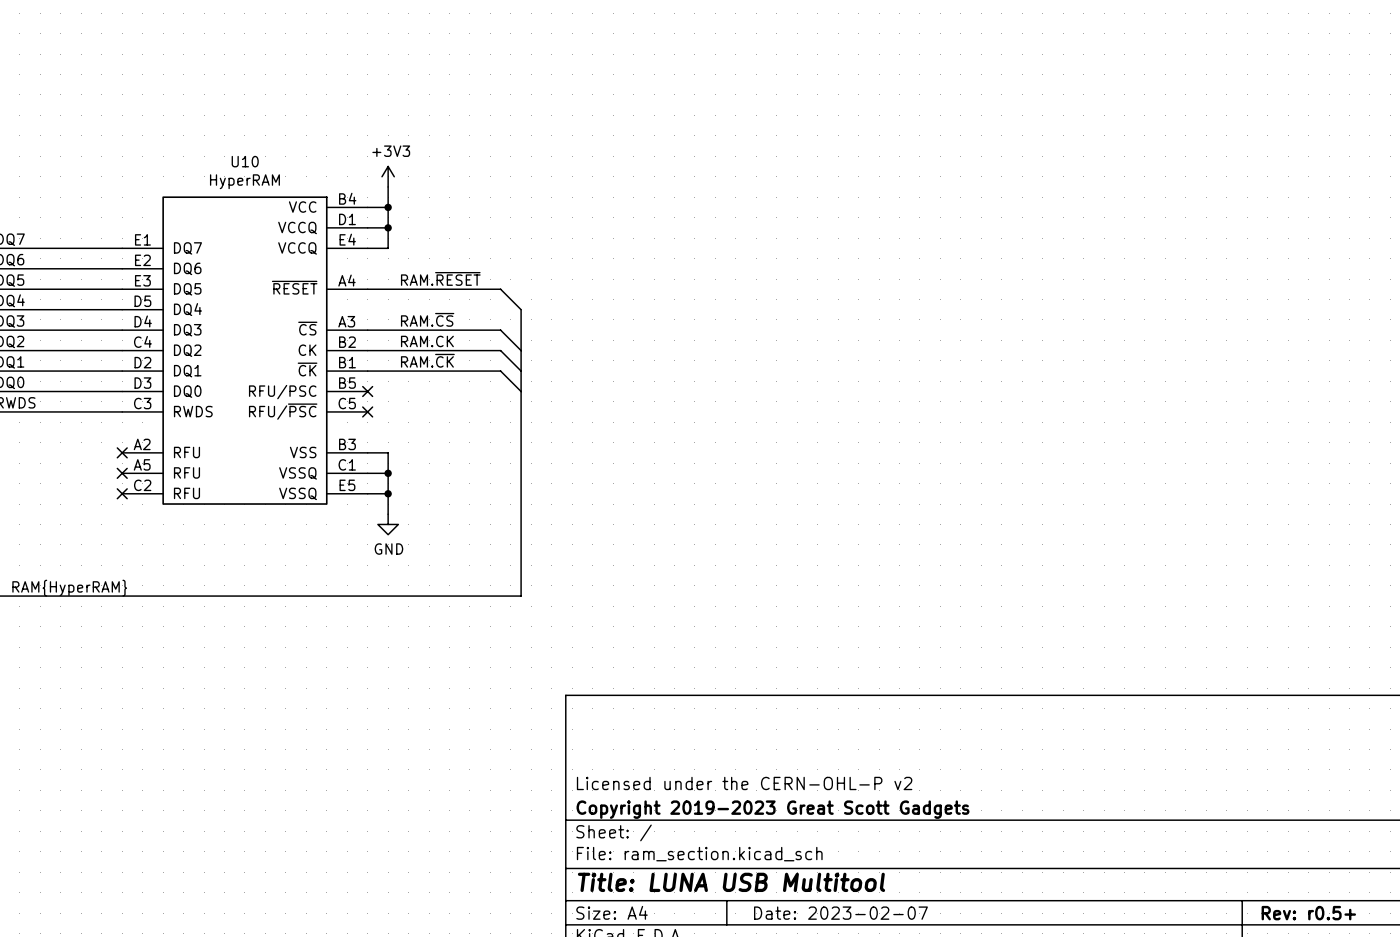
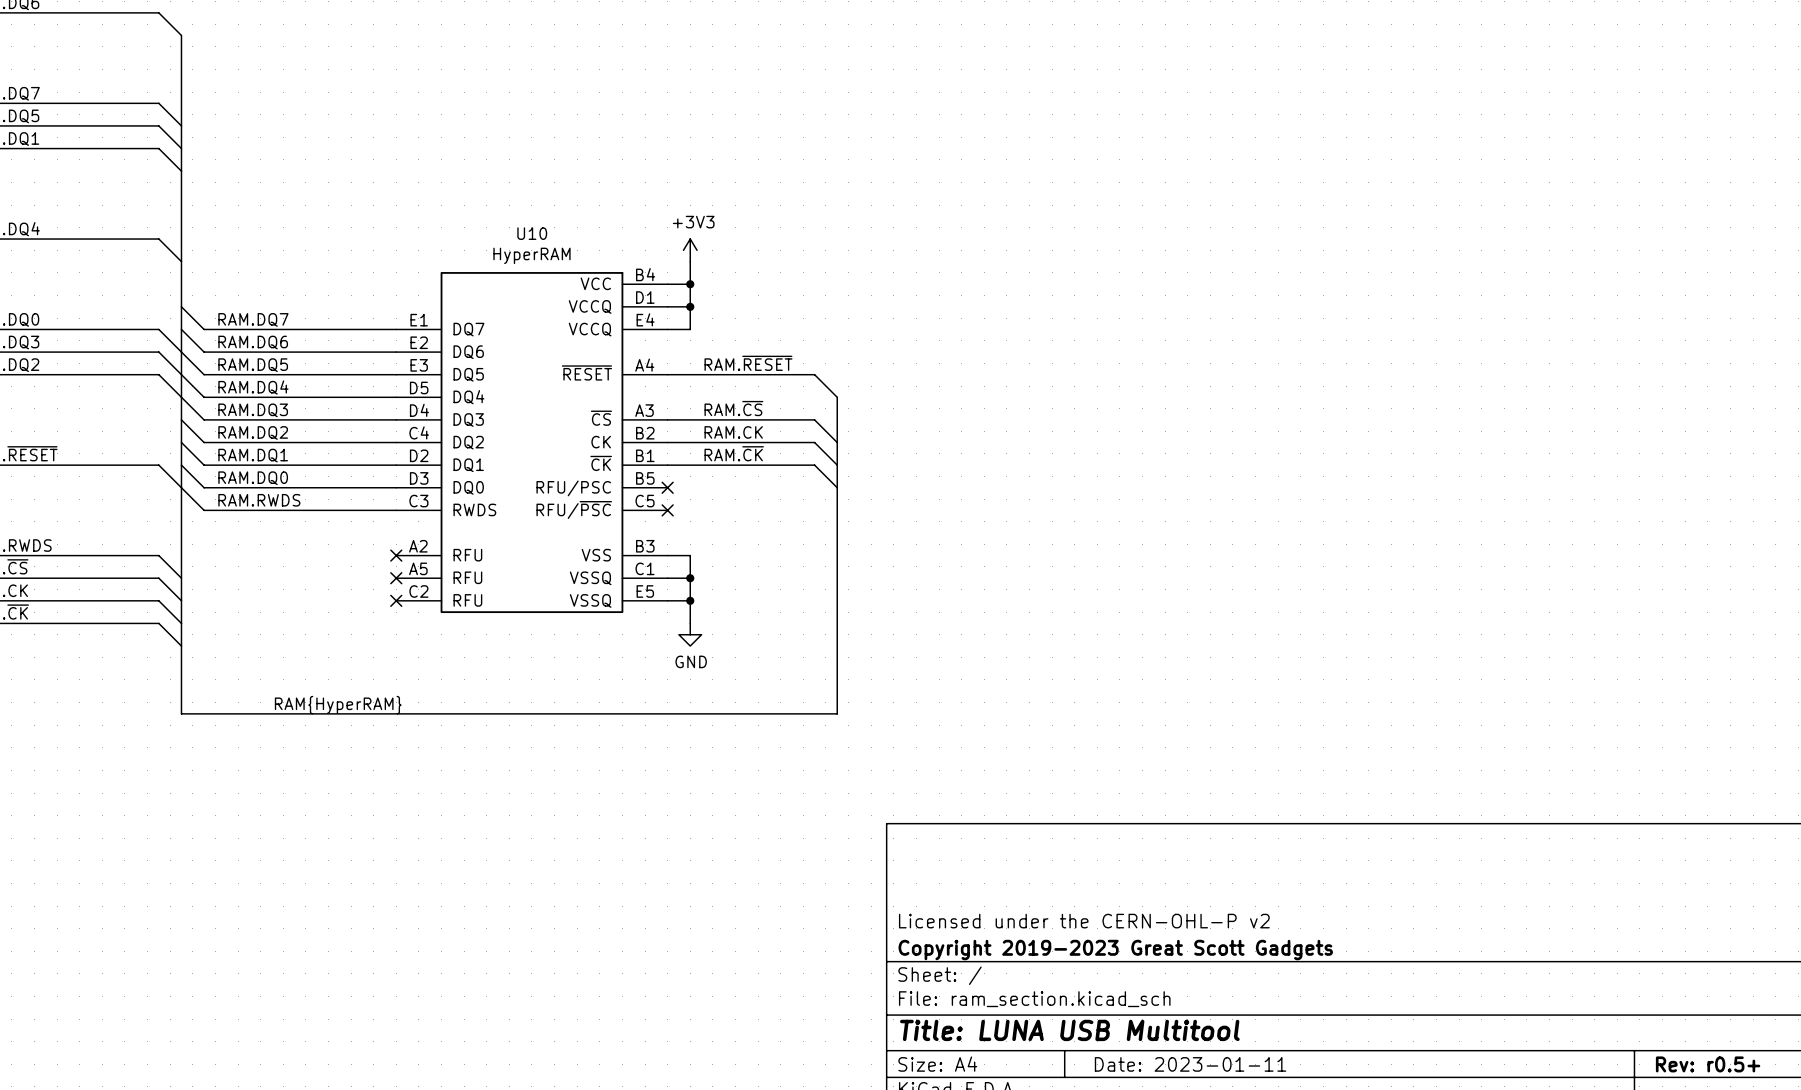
title block: Date: 2023-02-07 (840, 913) -> Date: 2023-01-11 (1190, 1064)

